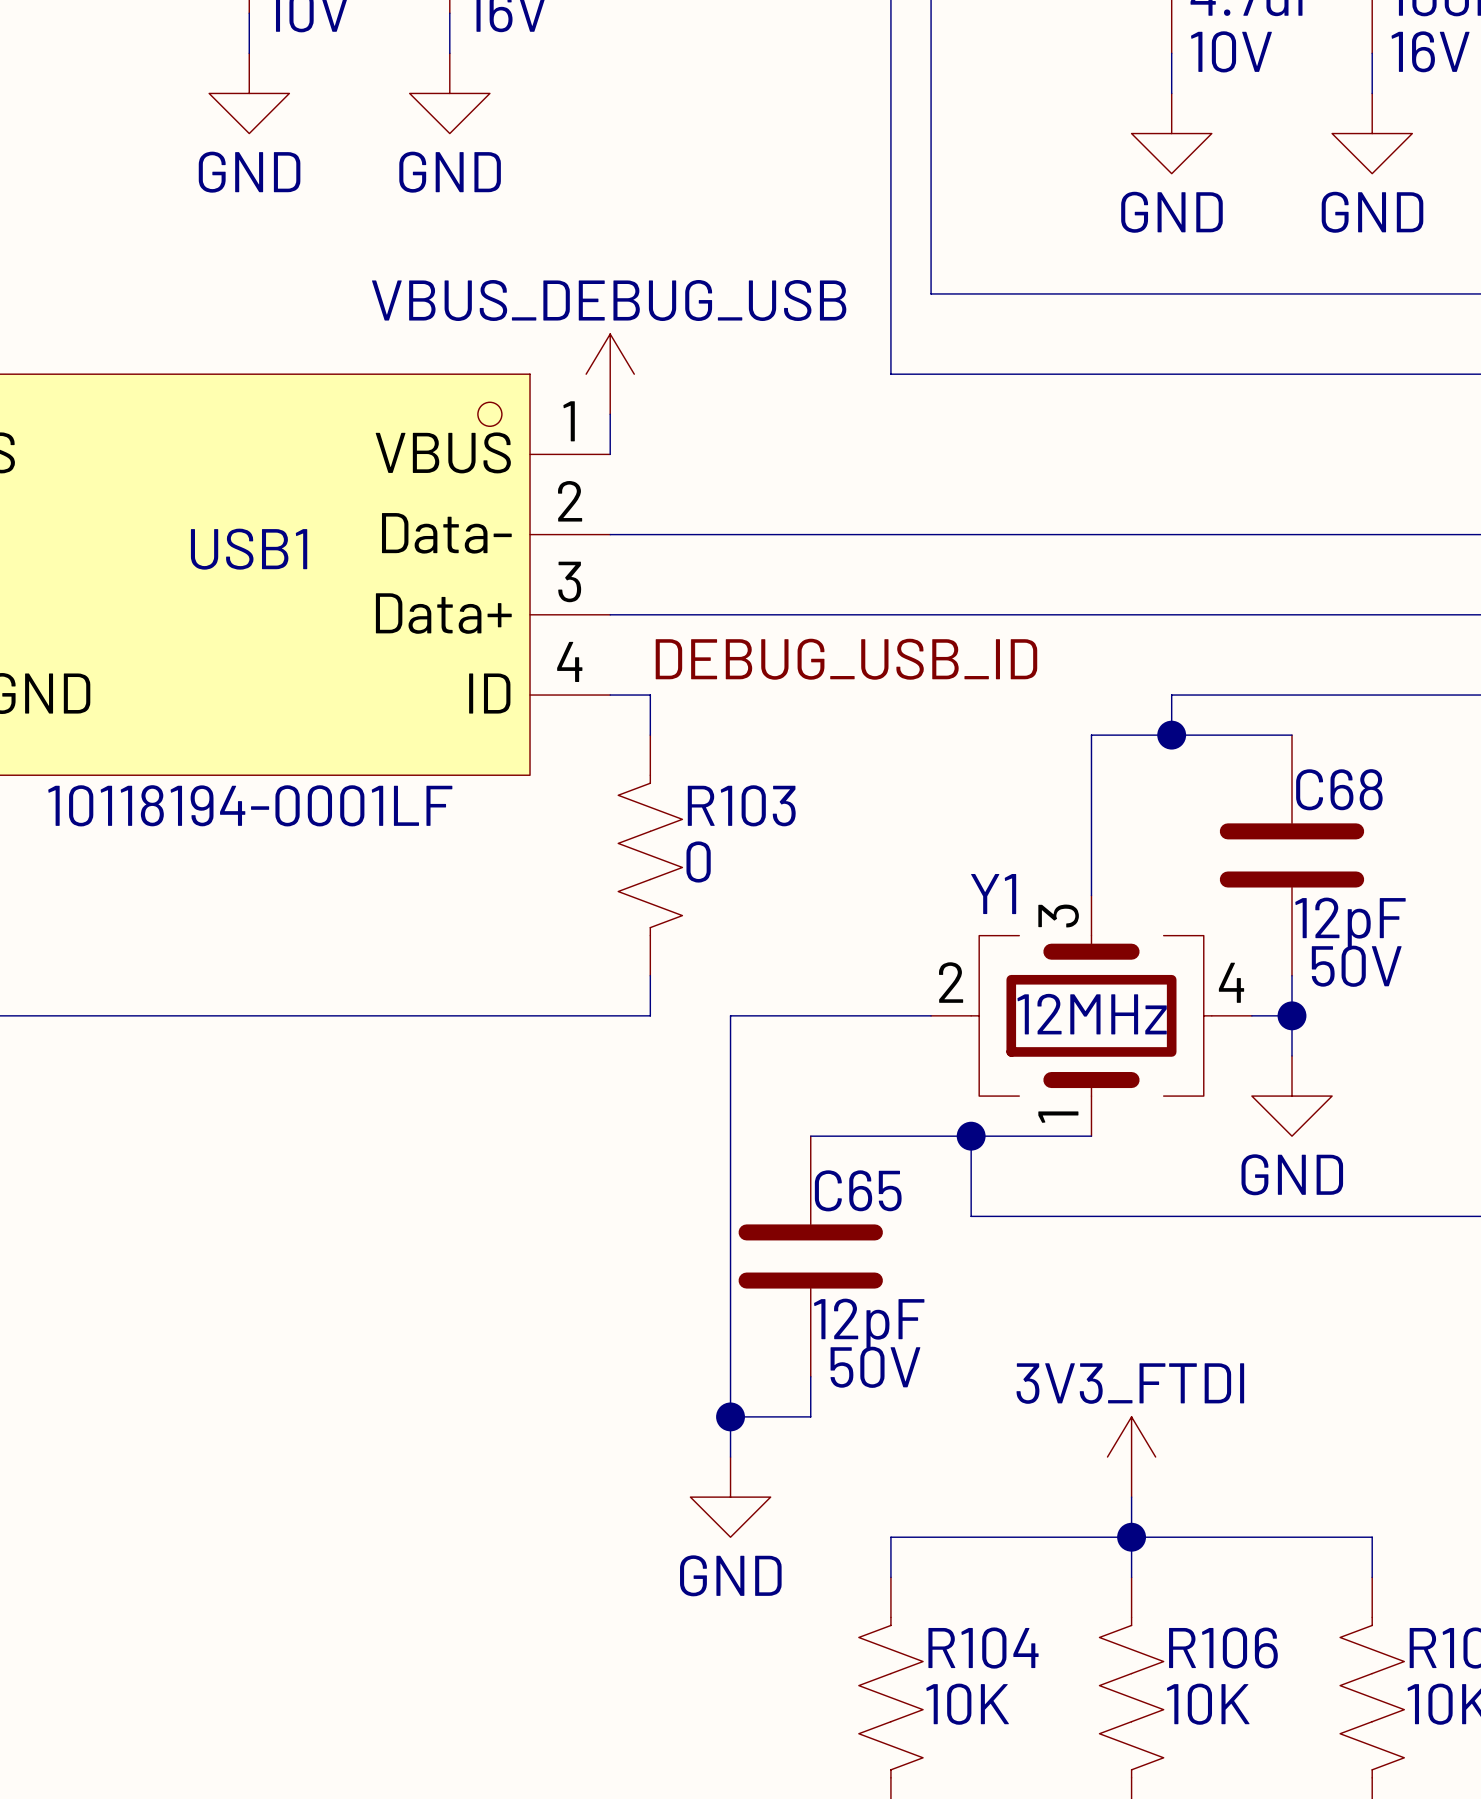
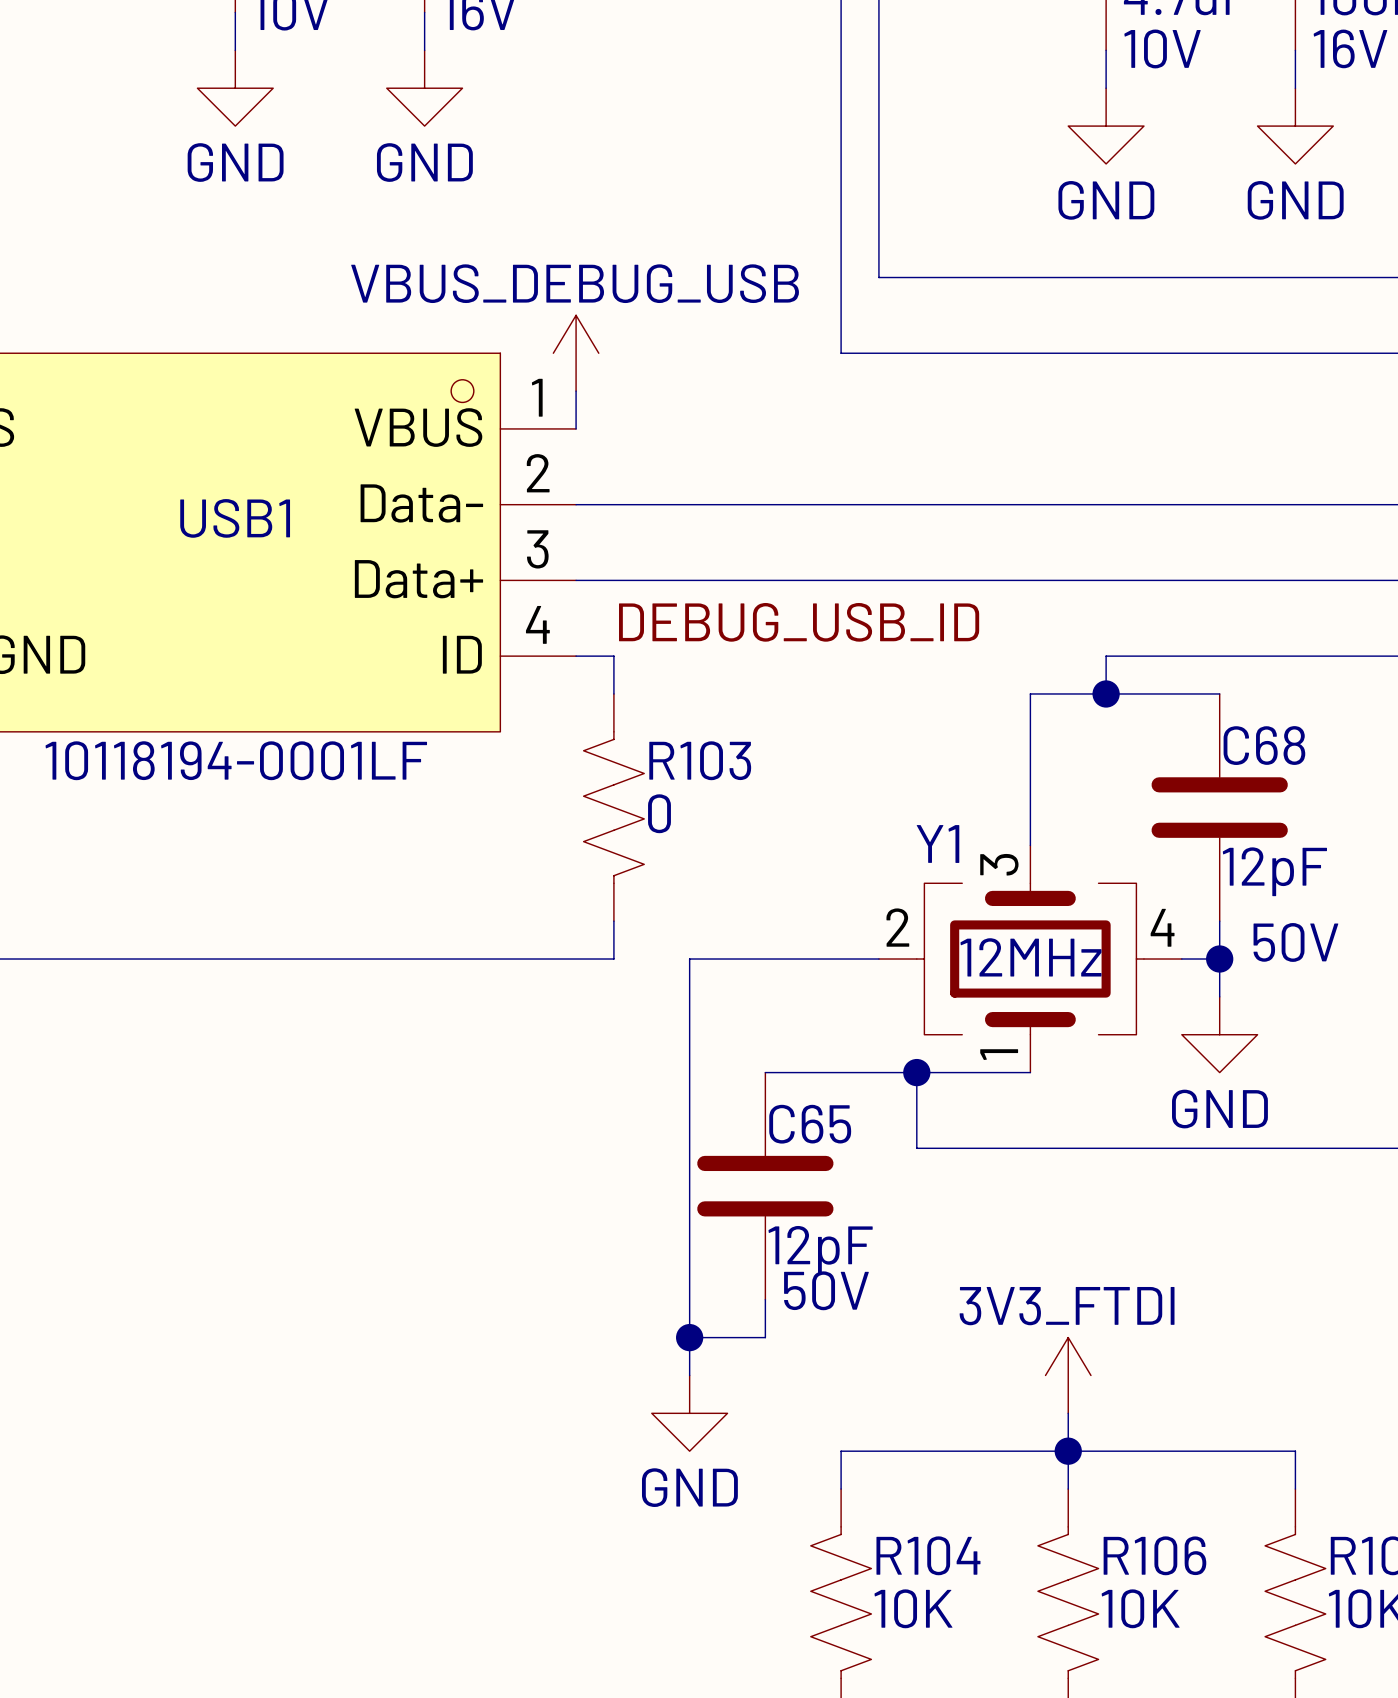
C68 text position: 50V (1356, 966) -> 50V (1295, 942)

